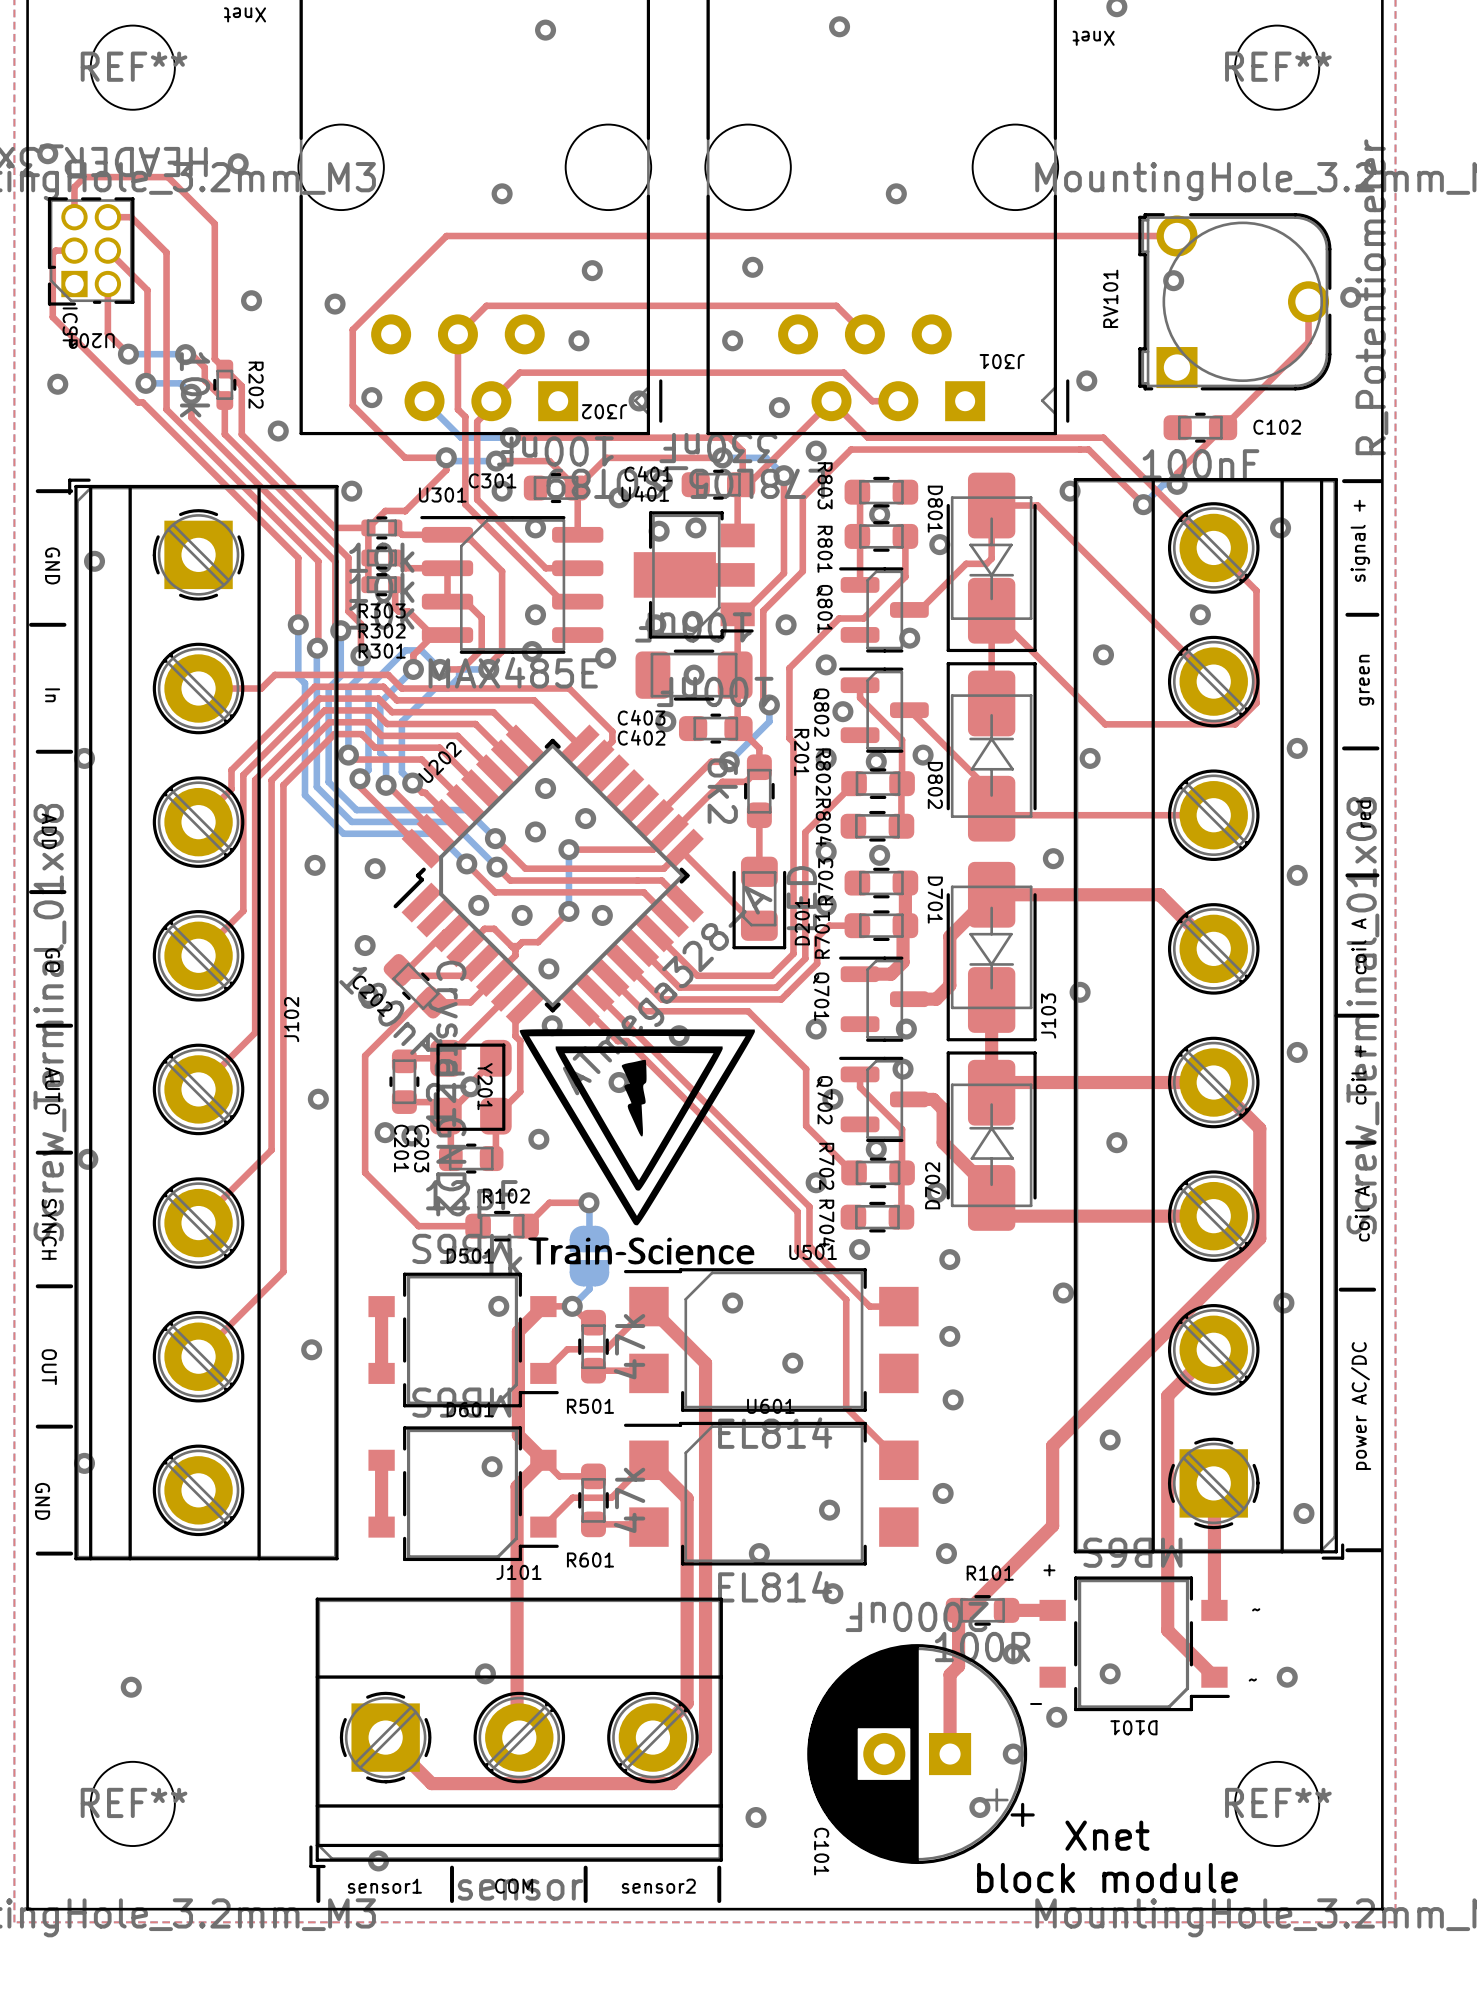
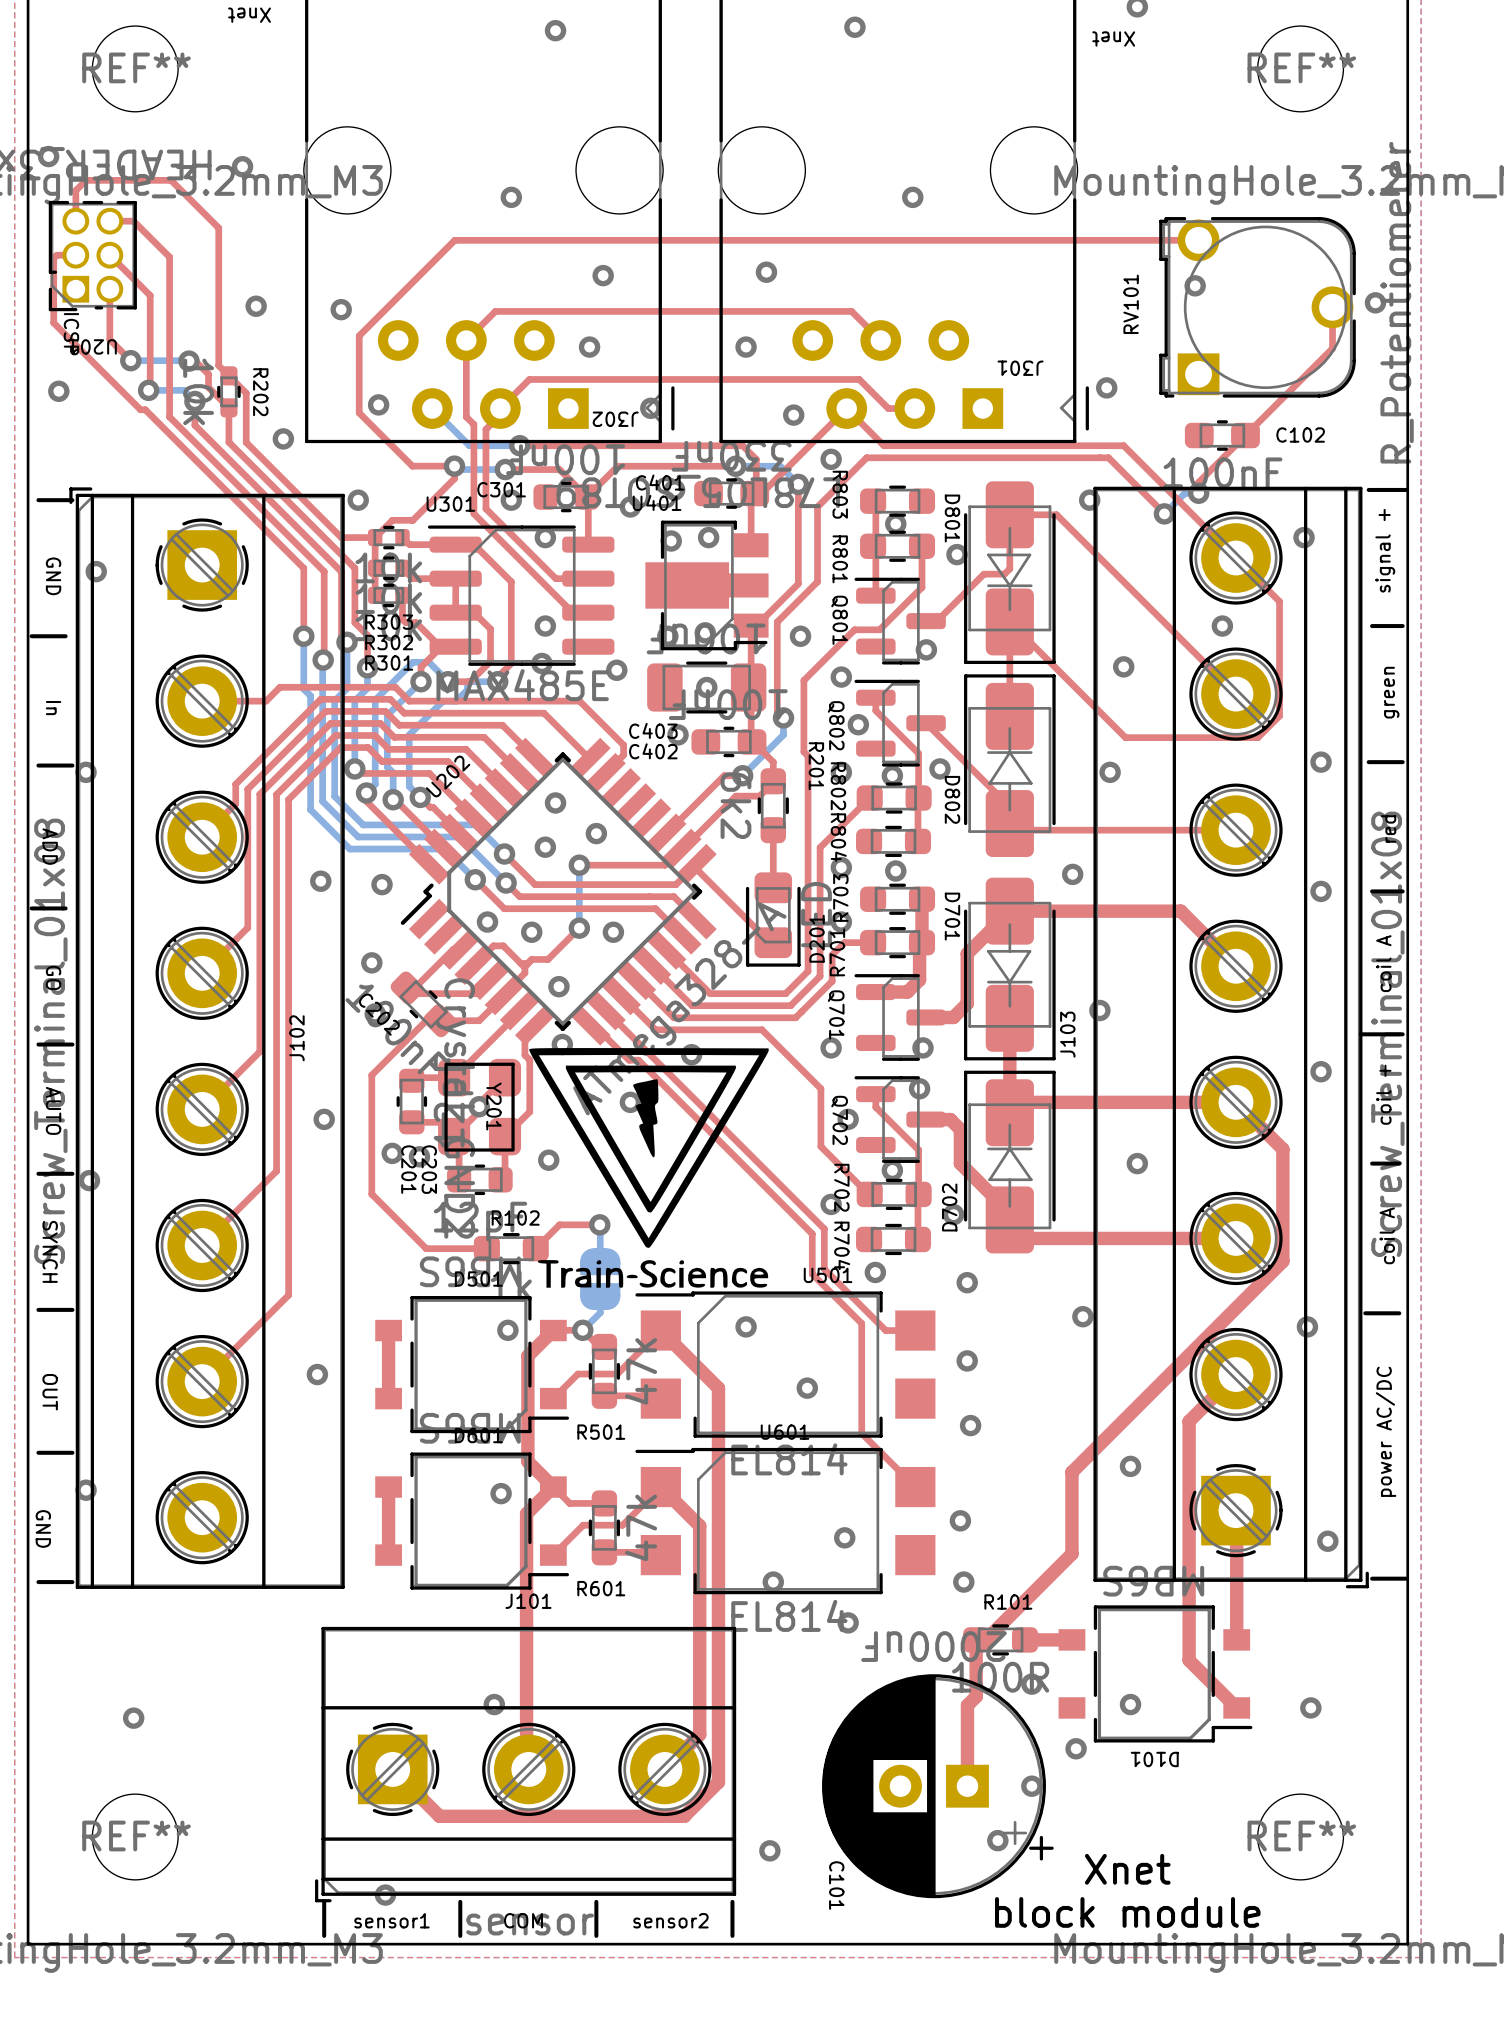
text: + (1049, 1570) -> none
text: ~ (1256, 1609) -> none
text: ~ (1252, 1679) -> none
text: - (1036, 1703) -> none

